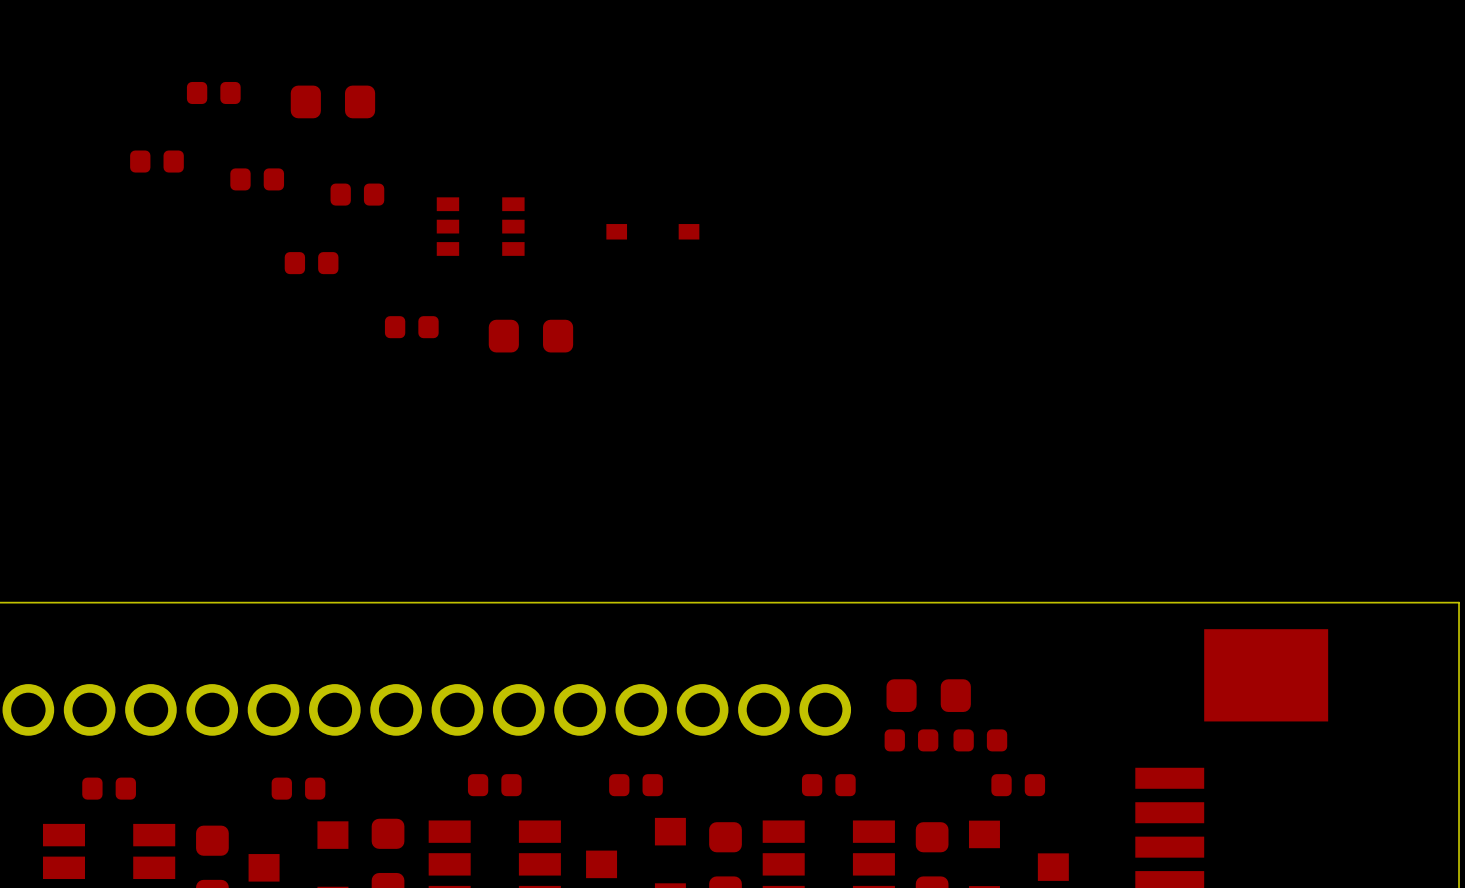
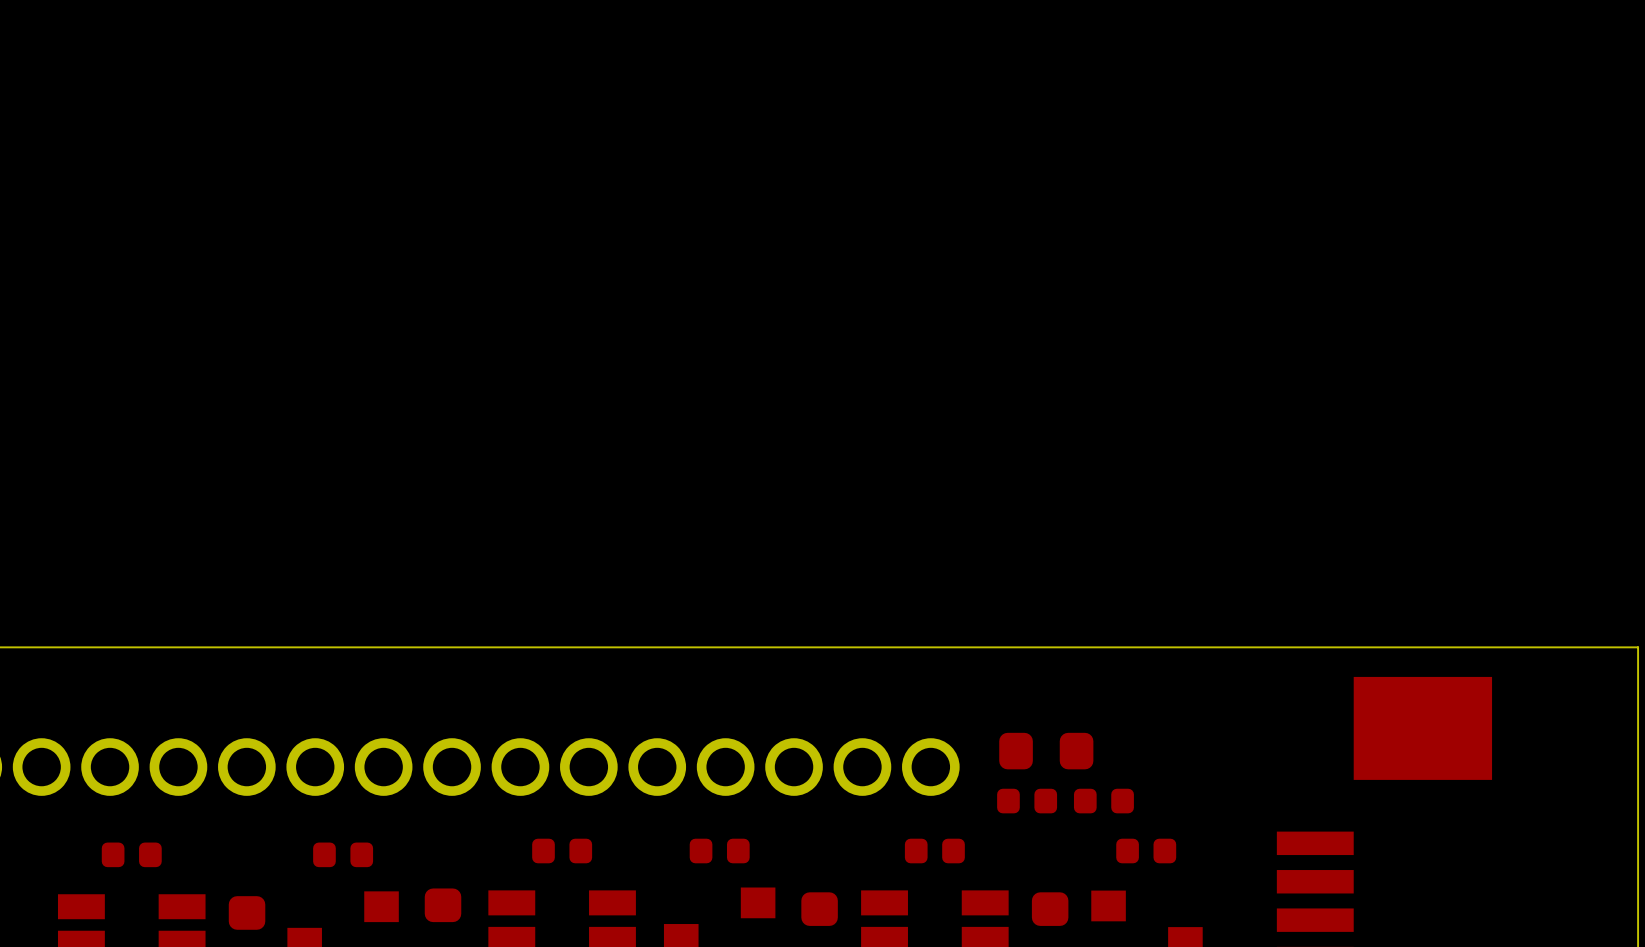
part: (213, 92) -> none
part: (332, 101) -> none
part: (156, 161) -> none
part: (257, 179) -> none
part: (357, 194) -> none
part: (480, 226) -> none
part: (652, 231) -> none
part: (311, 263) -> none
part: (411, 327) -> none
part: (530, 336) -> none

